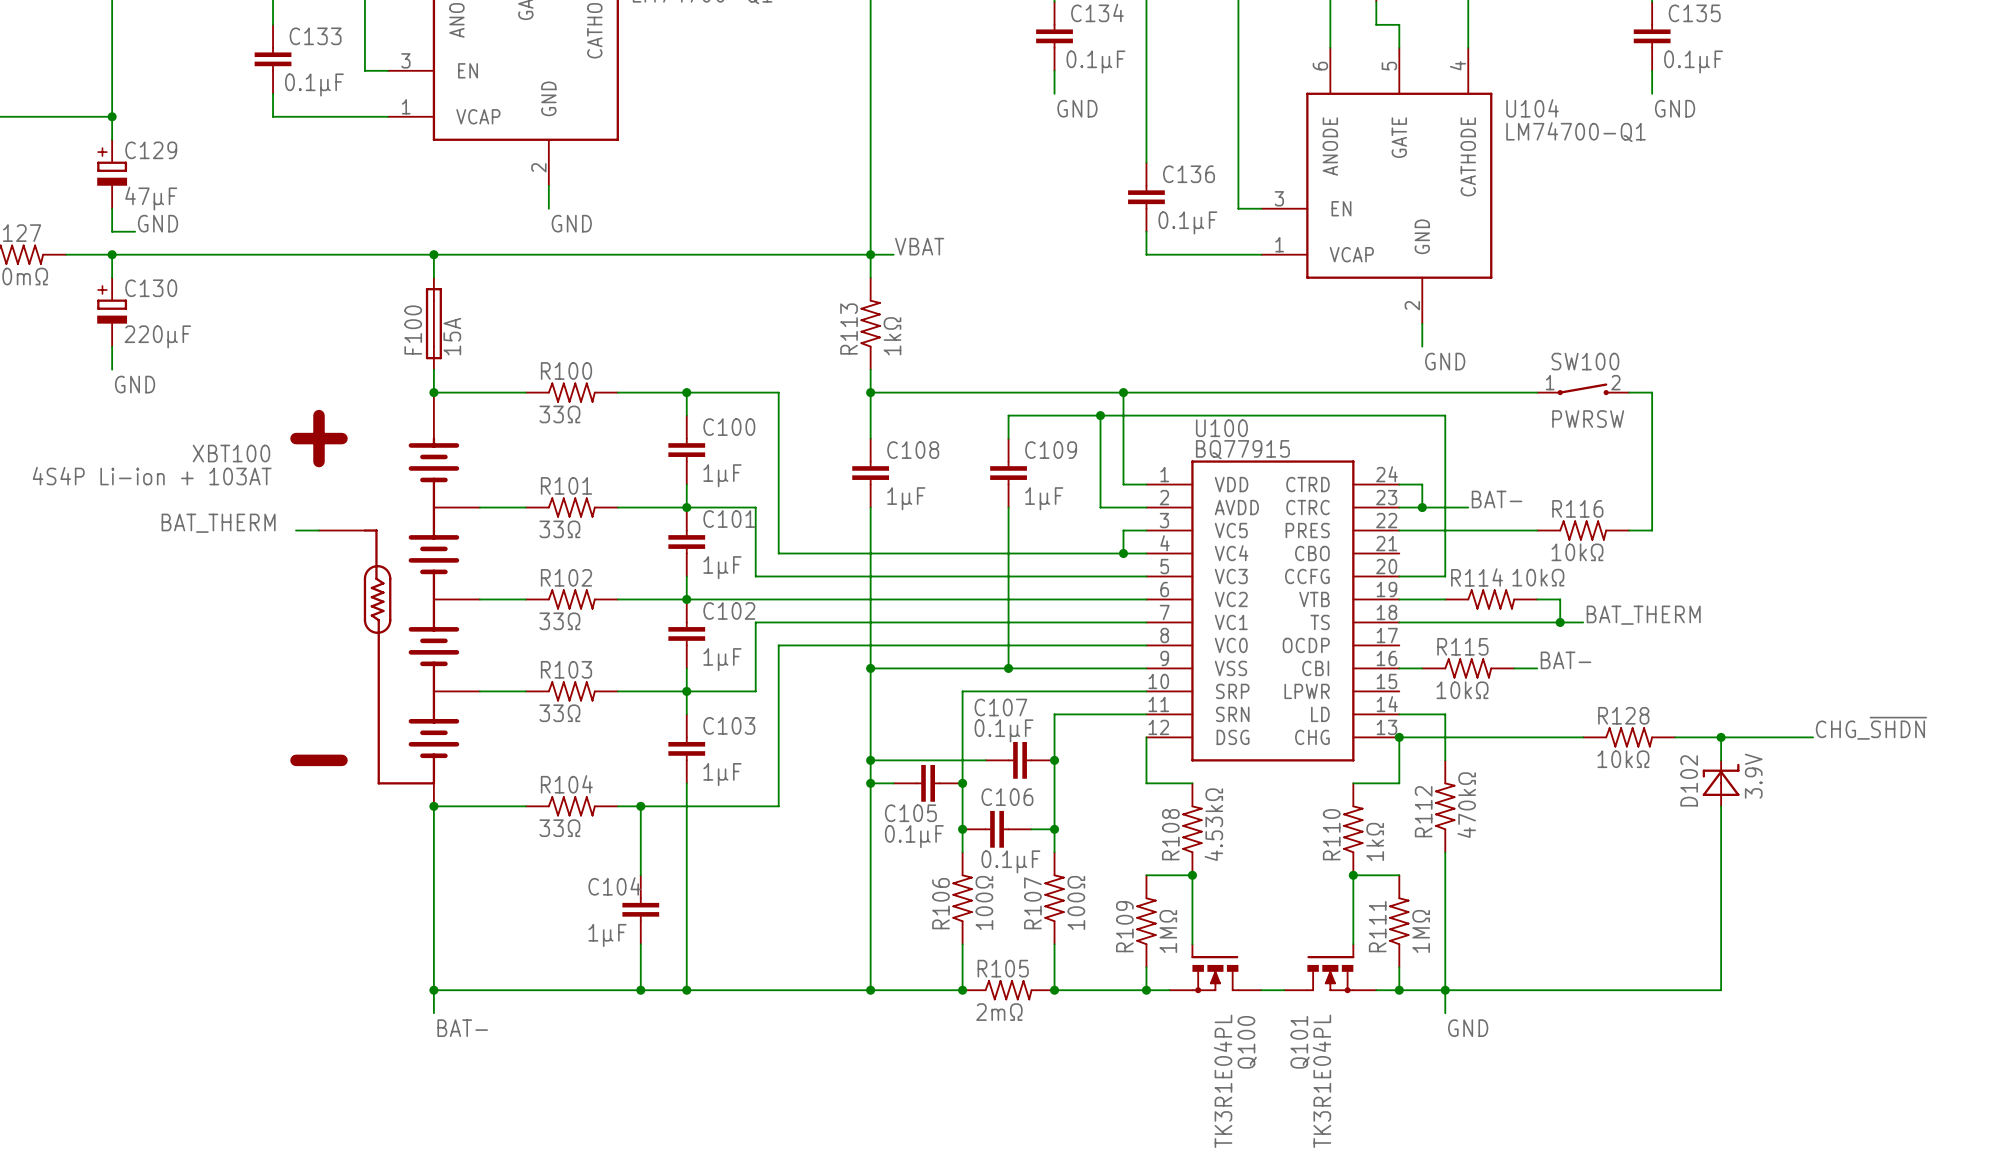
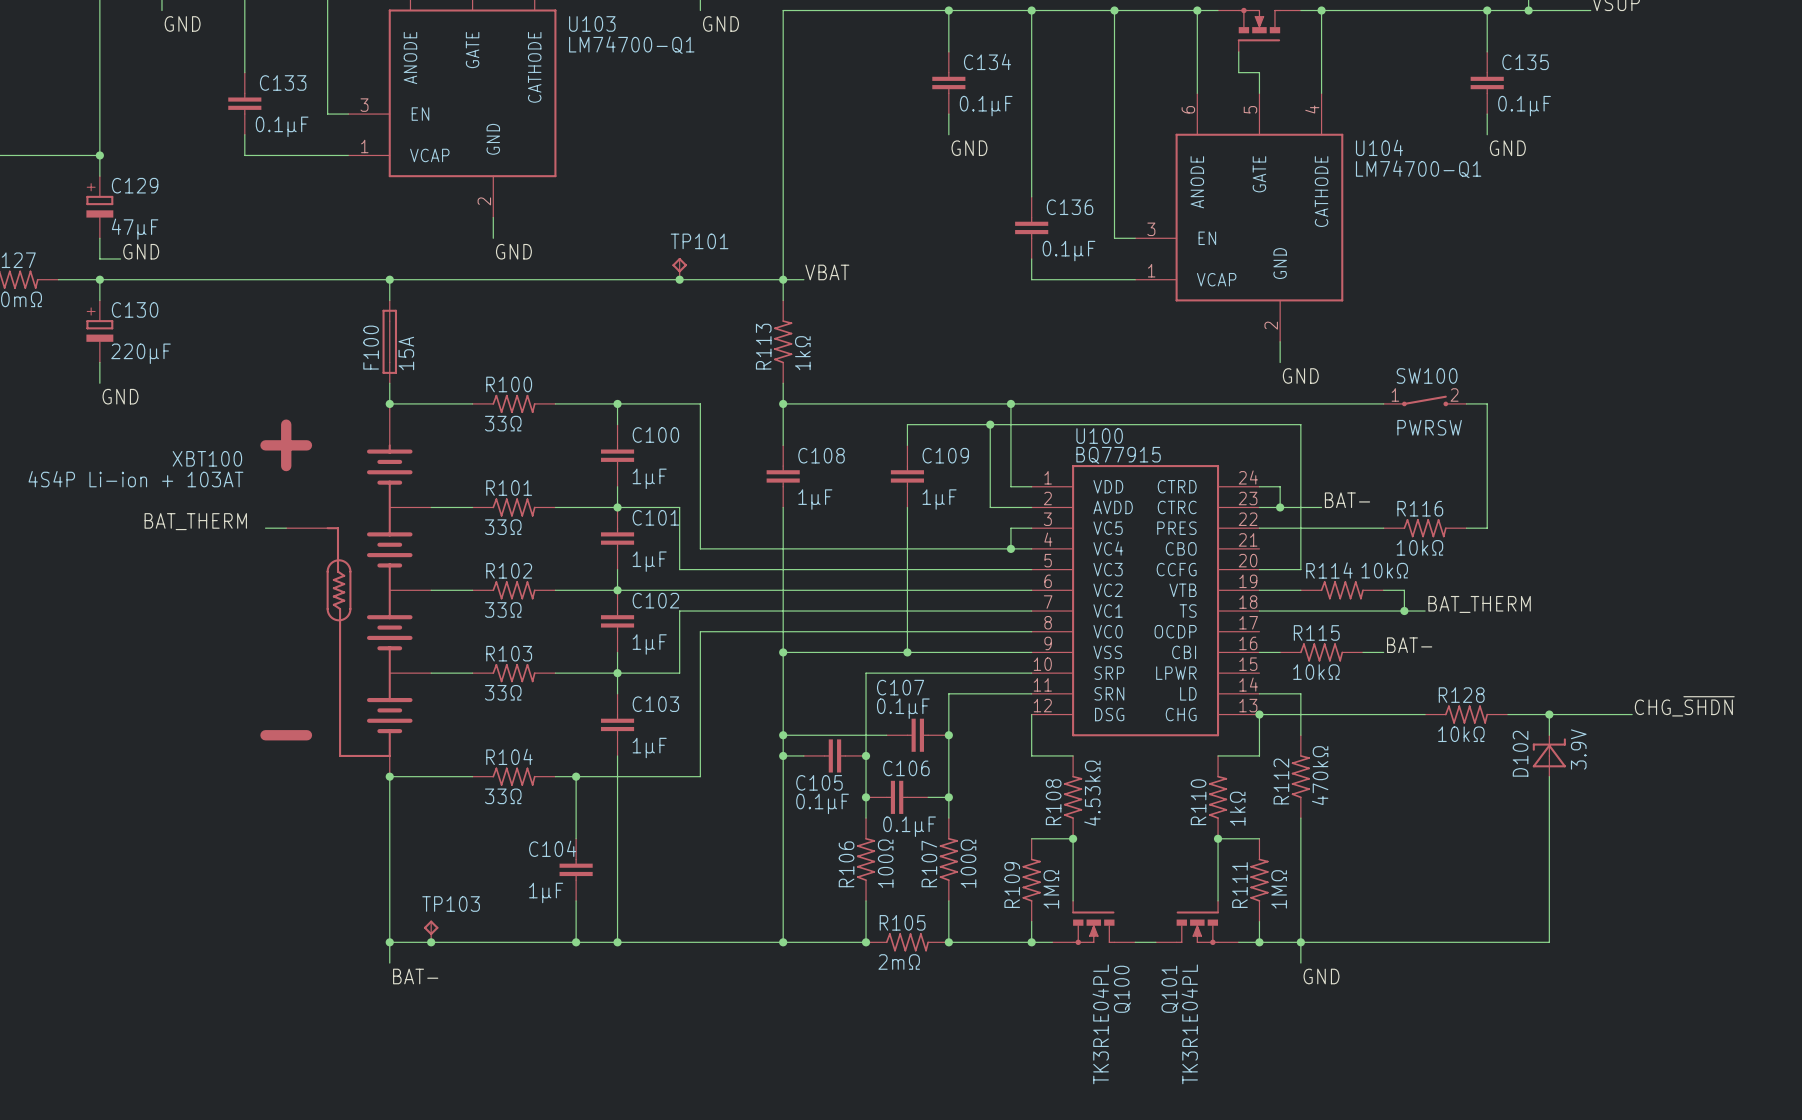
TP101: none -> (679, 268)
junction: none -> (679, 279)
TP103: none -> (431, 931)
junction: none -> (431, 942)

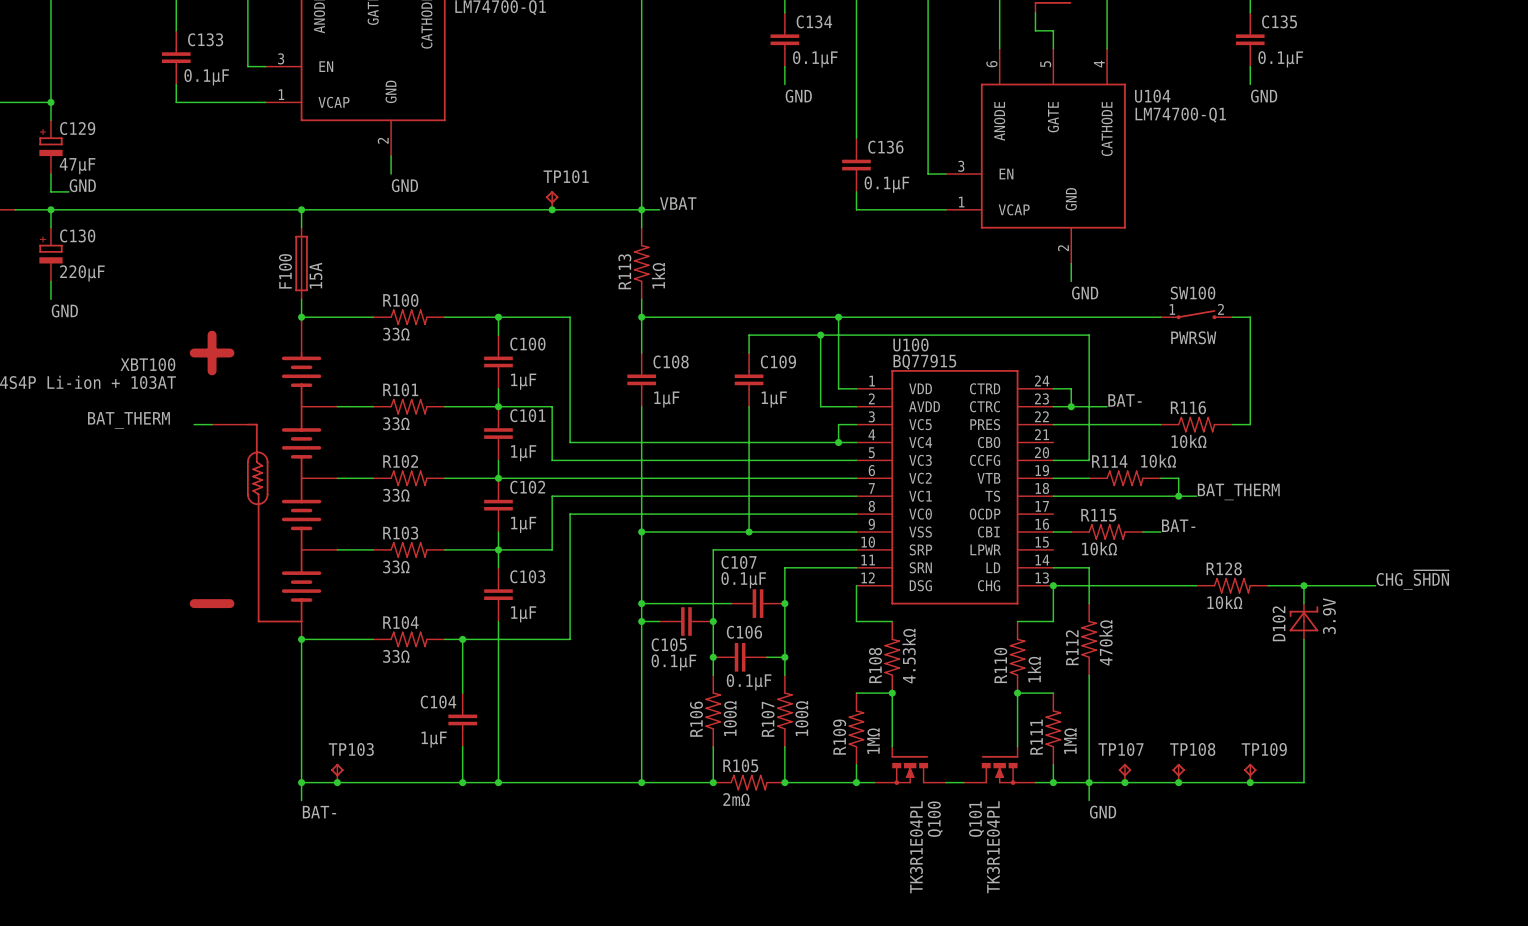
TP107: none -> (1124, 773)
TP108: none -> (1178, 773)
TP109: none -> (1250, 773)
junction: none -> (1124, 782)
junction: none -> (1178, 782)
junction: none -> (1250, 782)

